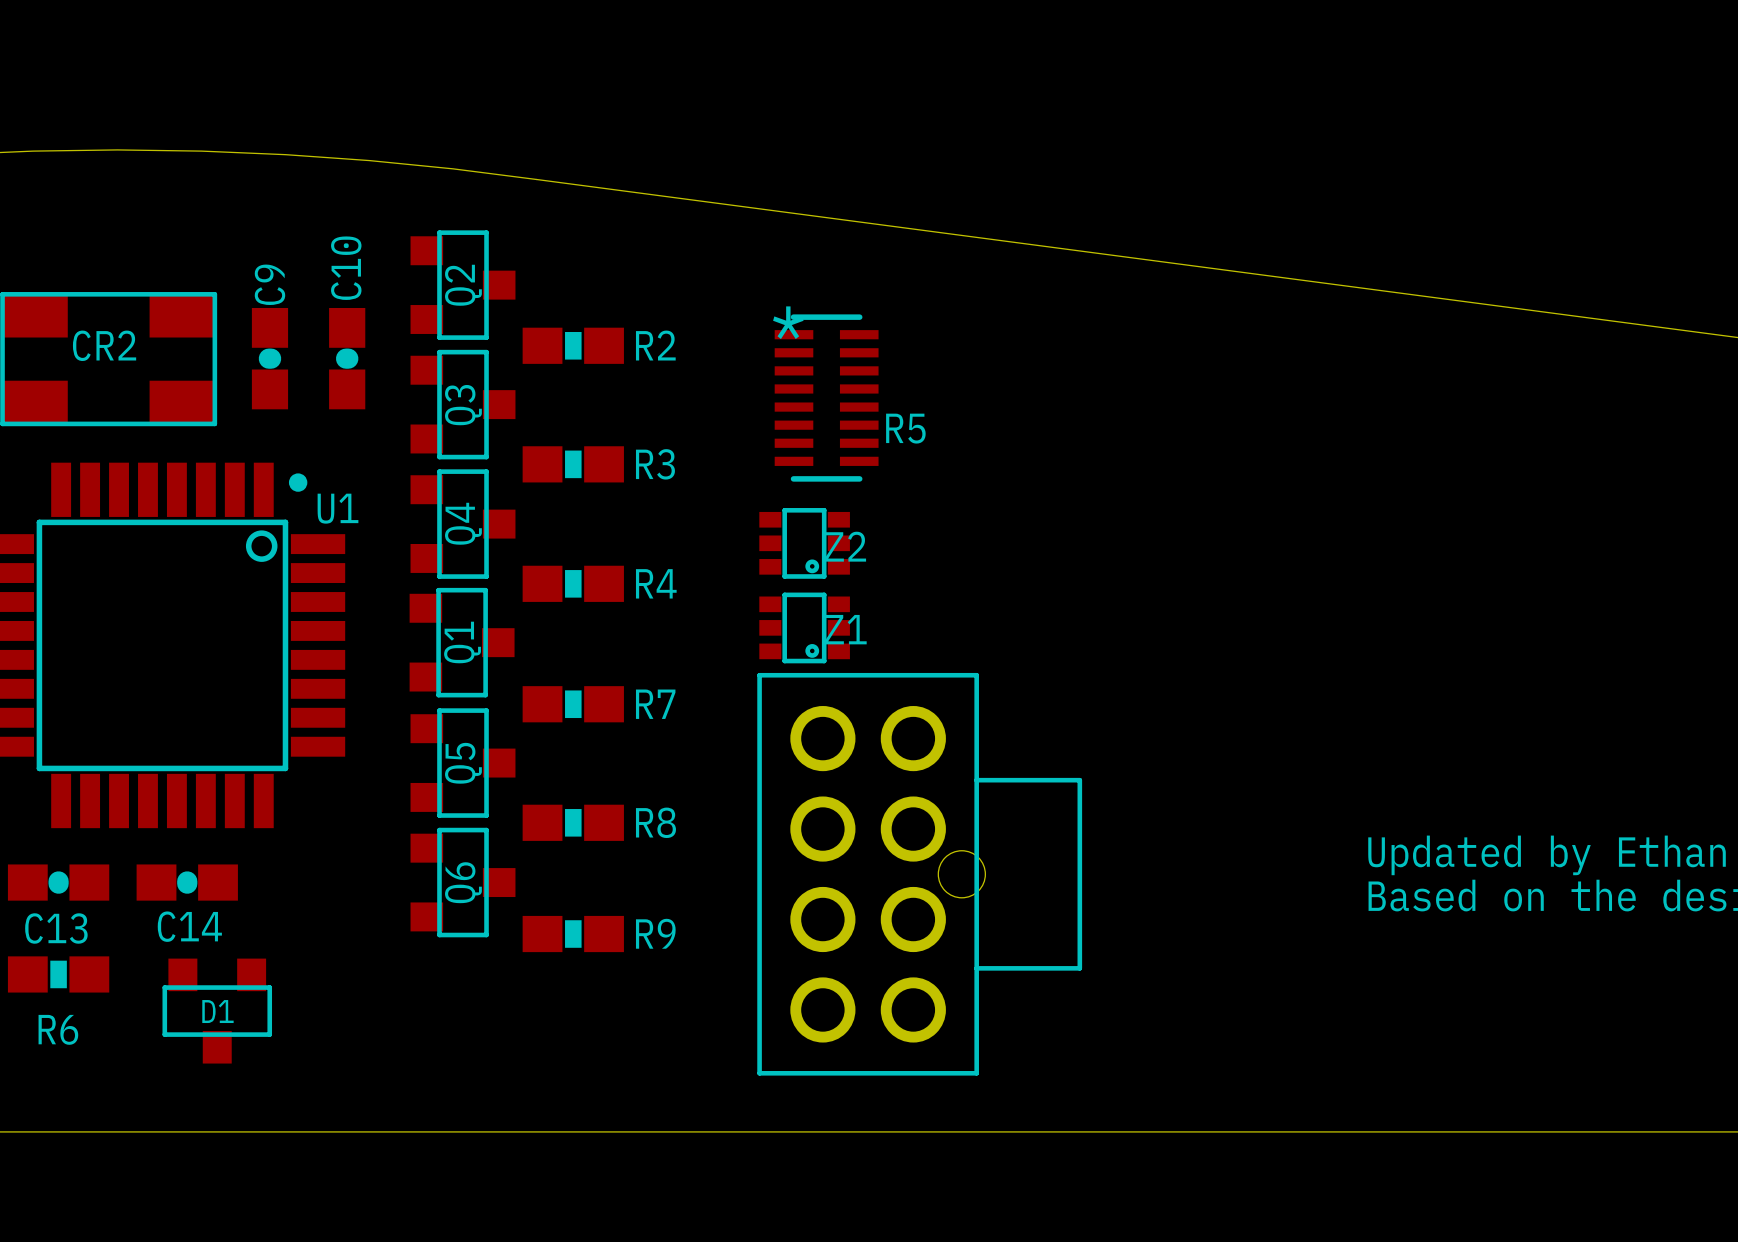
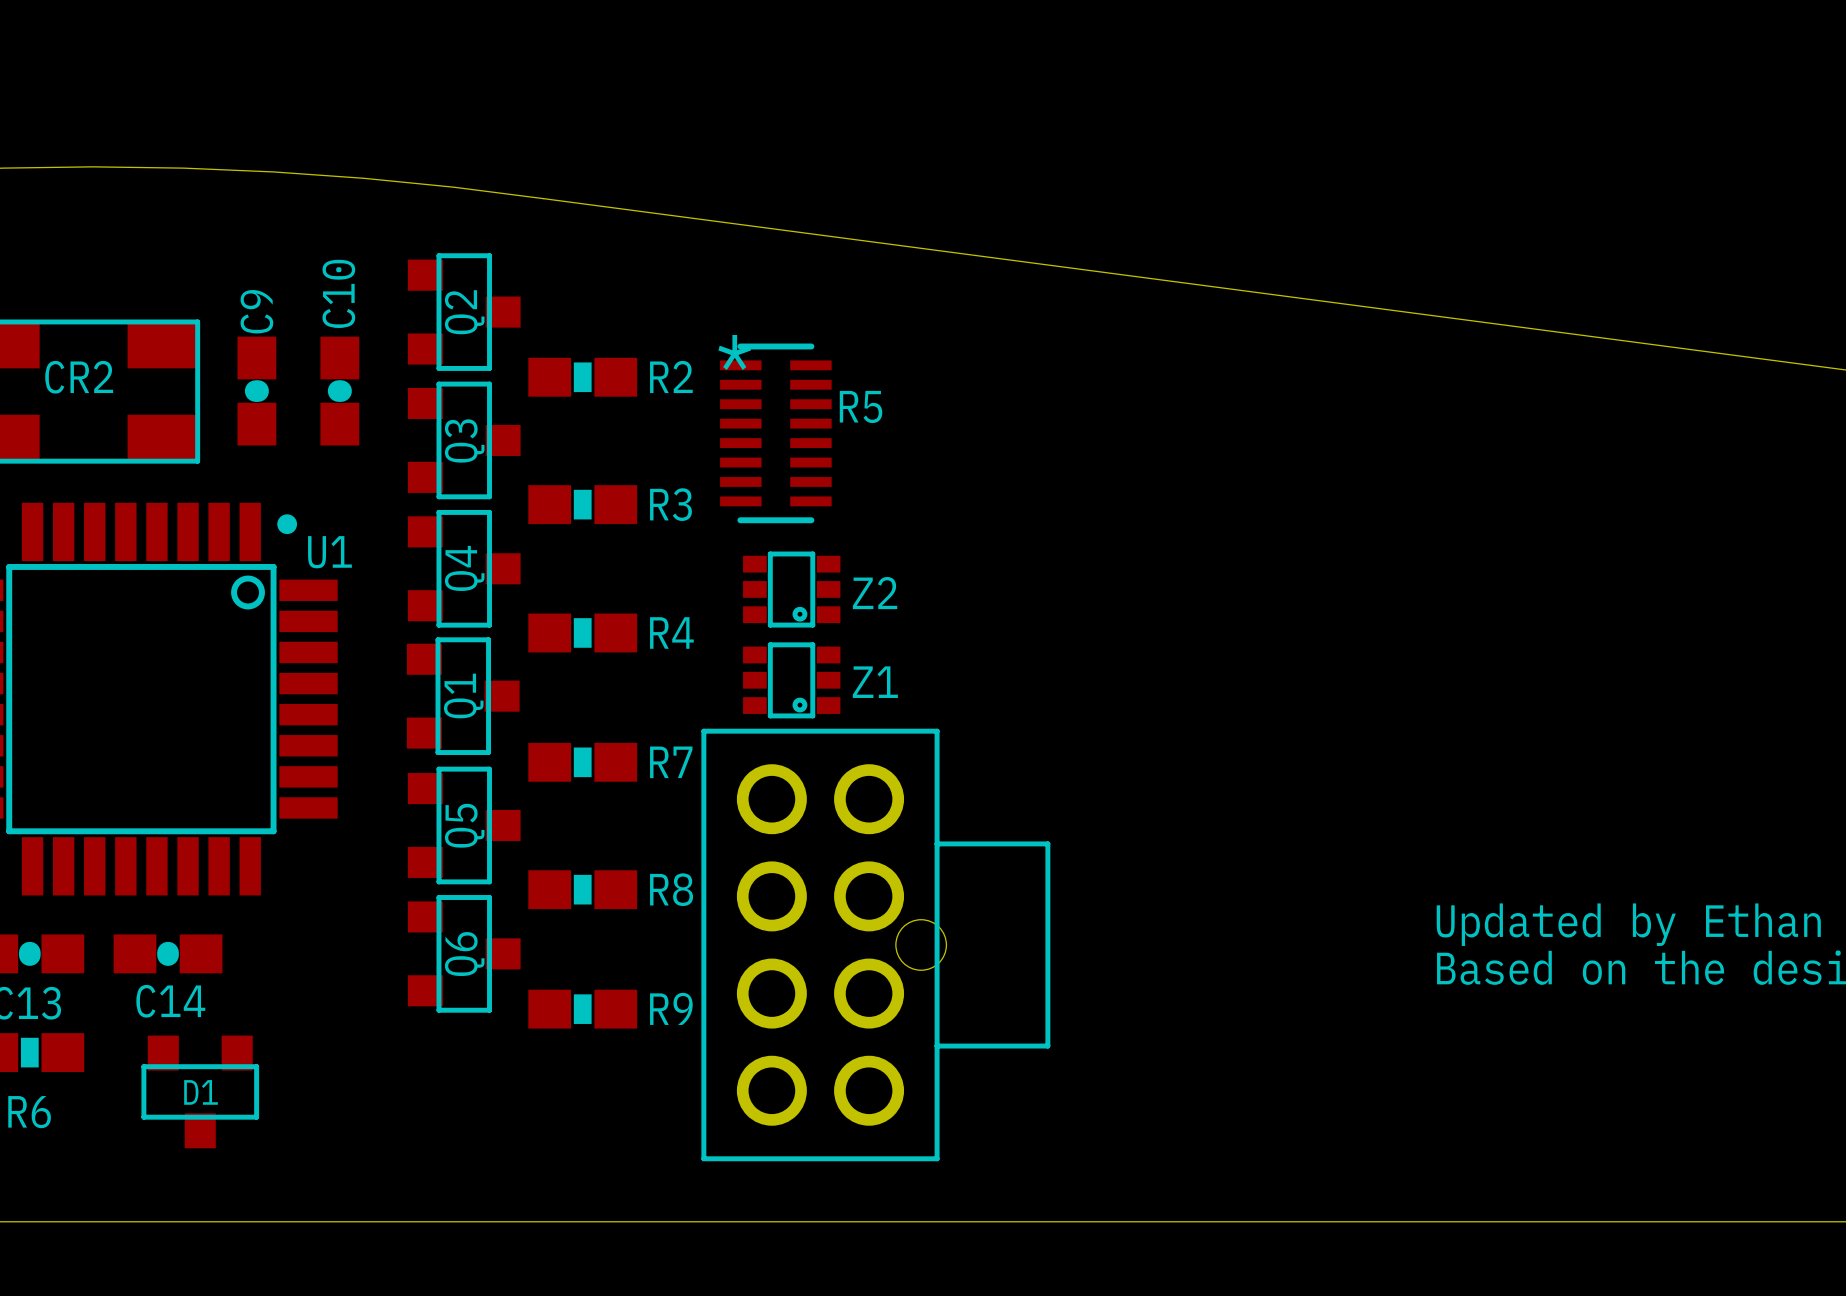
R5 position: (826, 398) -> (775, 433)
R5 name position: R5 (905, 428) -> R5 (861, 406)
part position: (804, 543) -> (791, 589)
part position: (804, 627) -> (791, 680)
part position: (919, 874) -> (875, 944)

